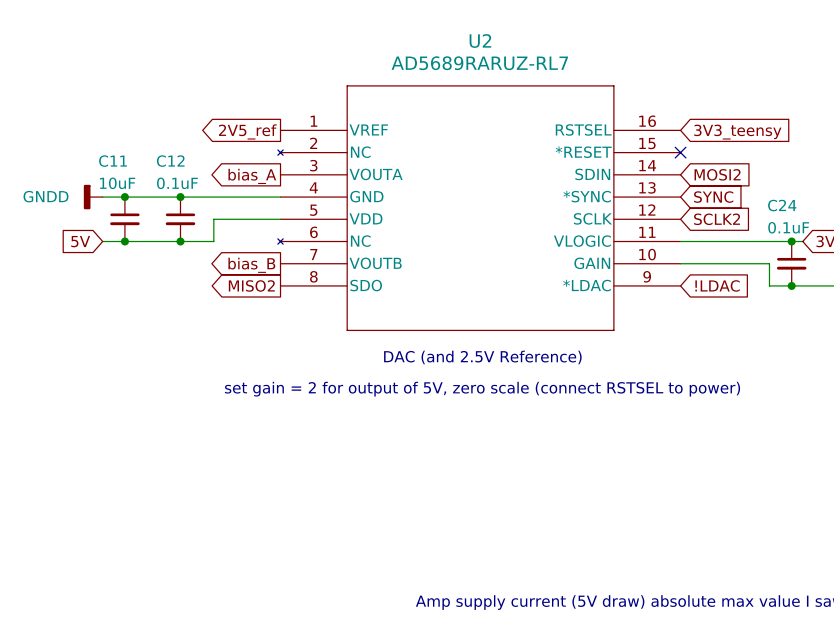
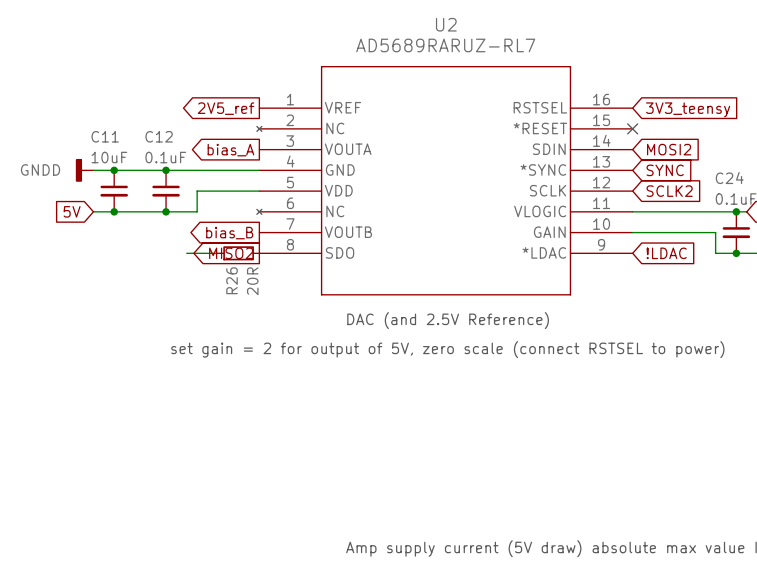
wire: none -> (186, 253) (217, 253)
R26: none -> 20R (238, 253)

